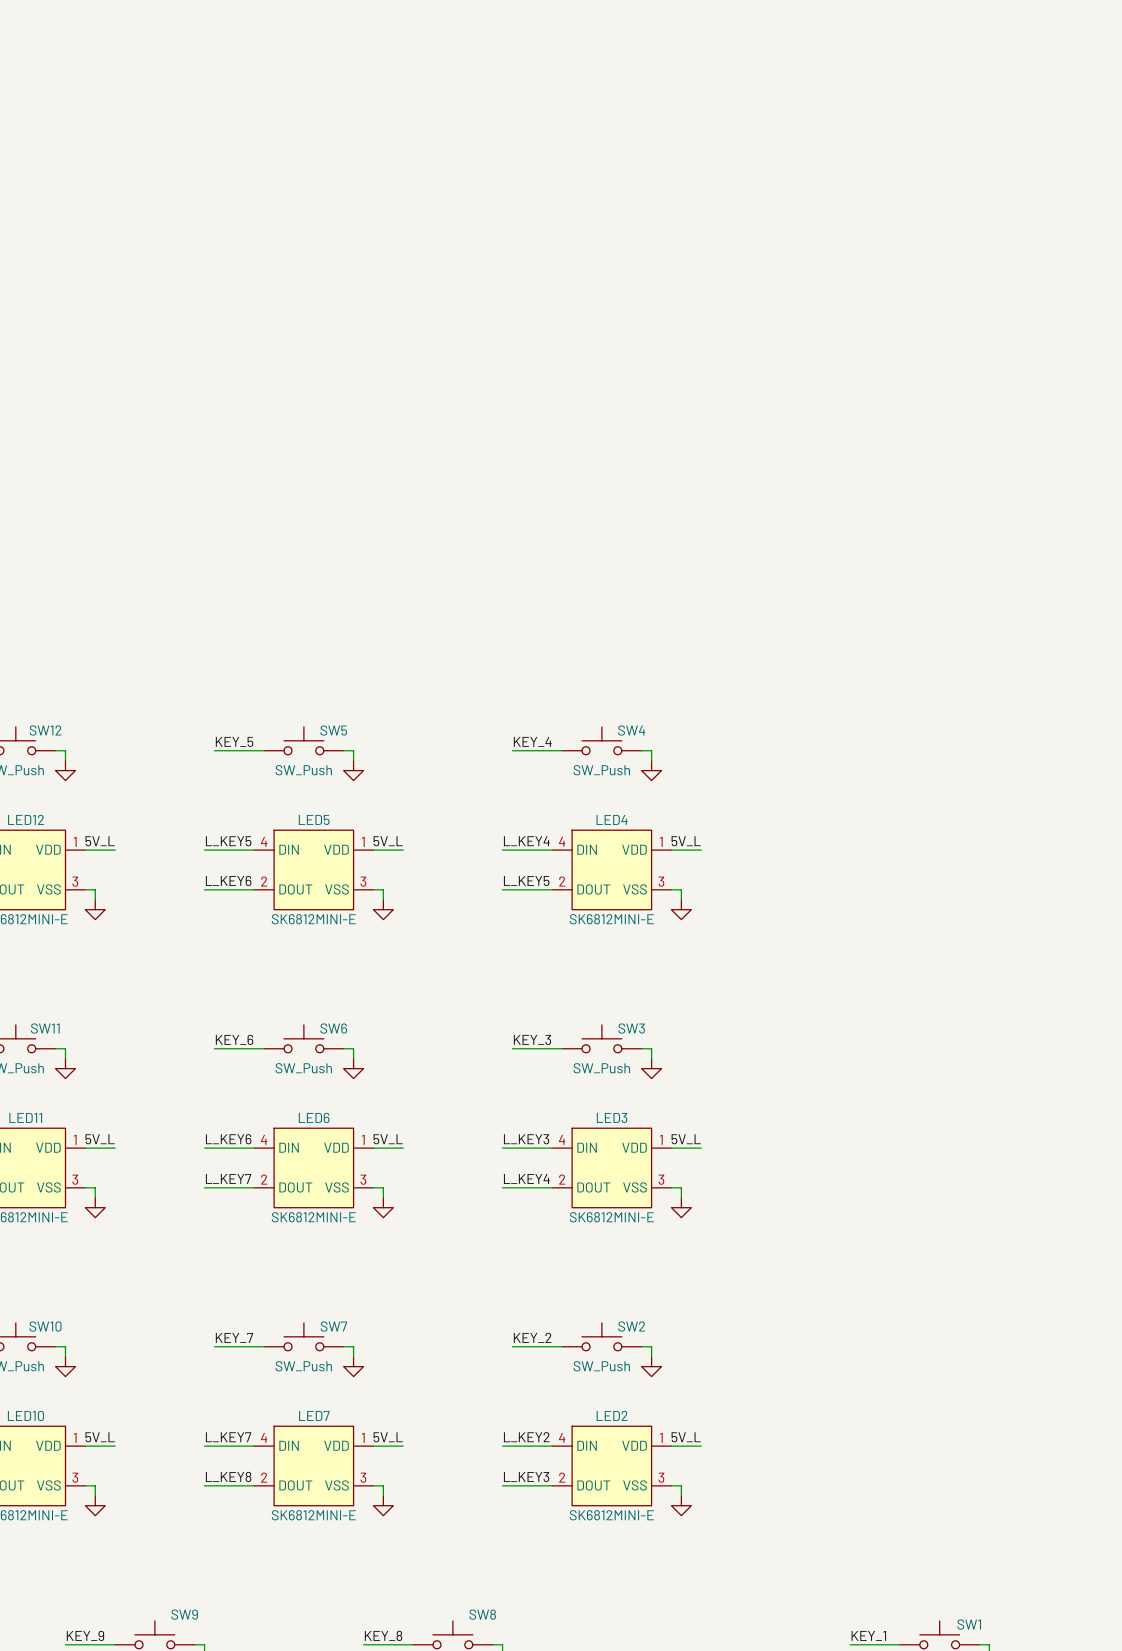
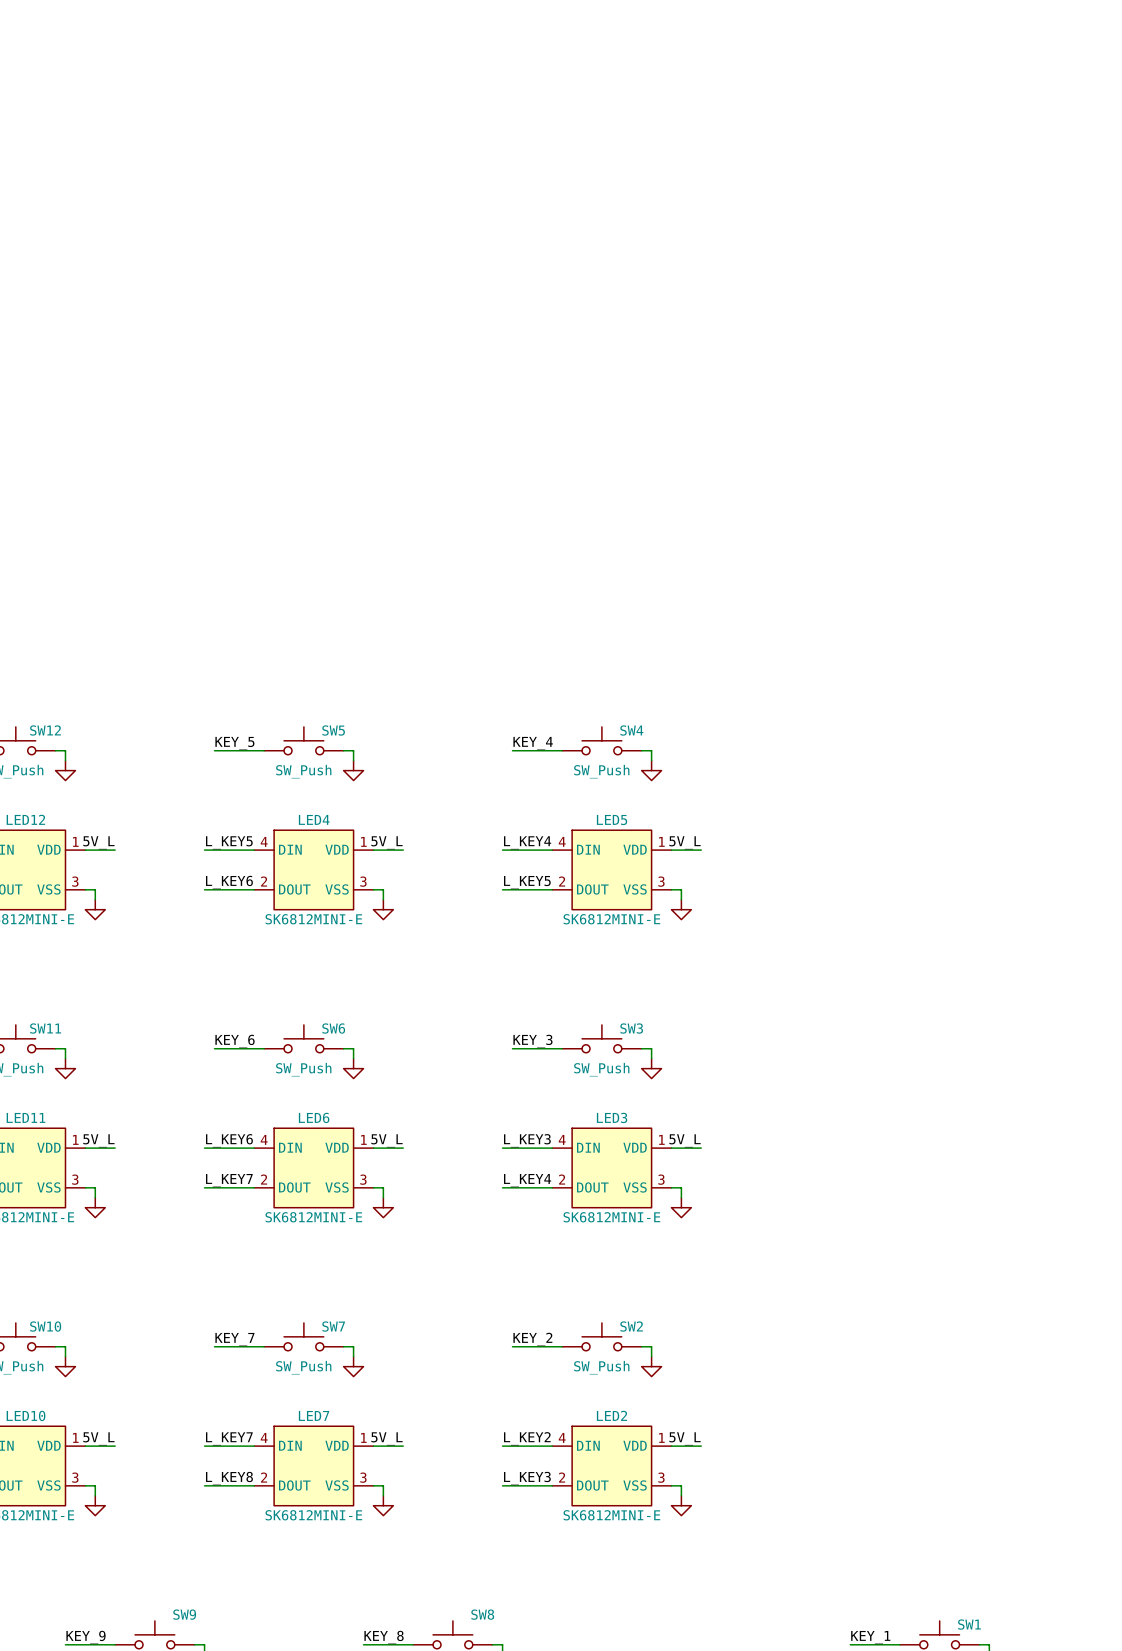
LED5 name: LED5 (314, 819) -> LED4 (314, 819)
LED4 name: LED4 (612, 819) -> LED5 (612, 820)

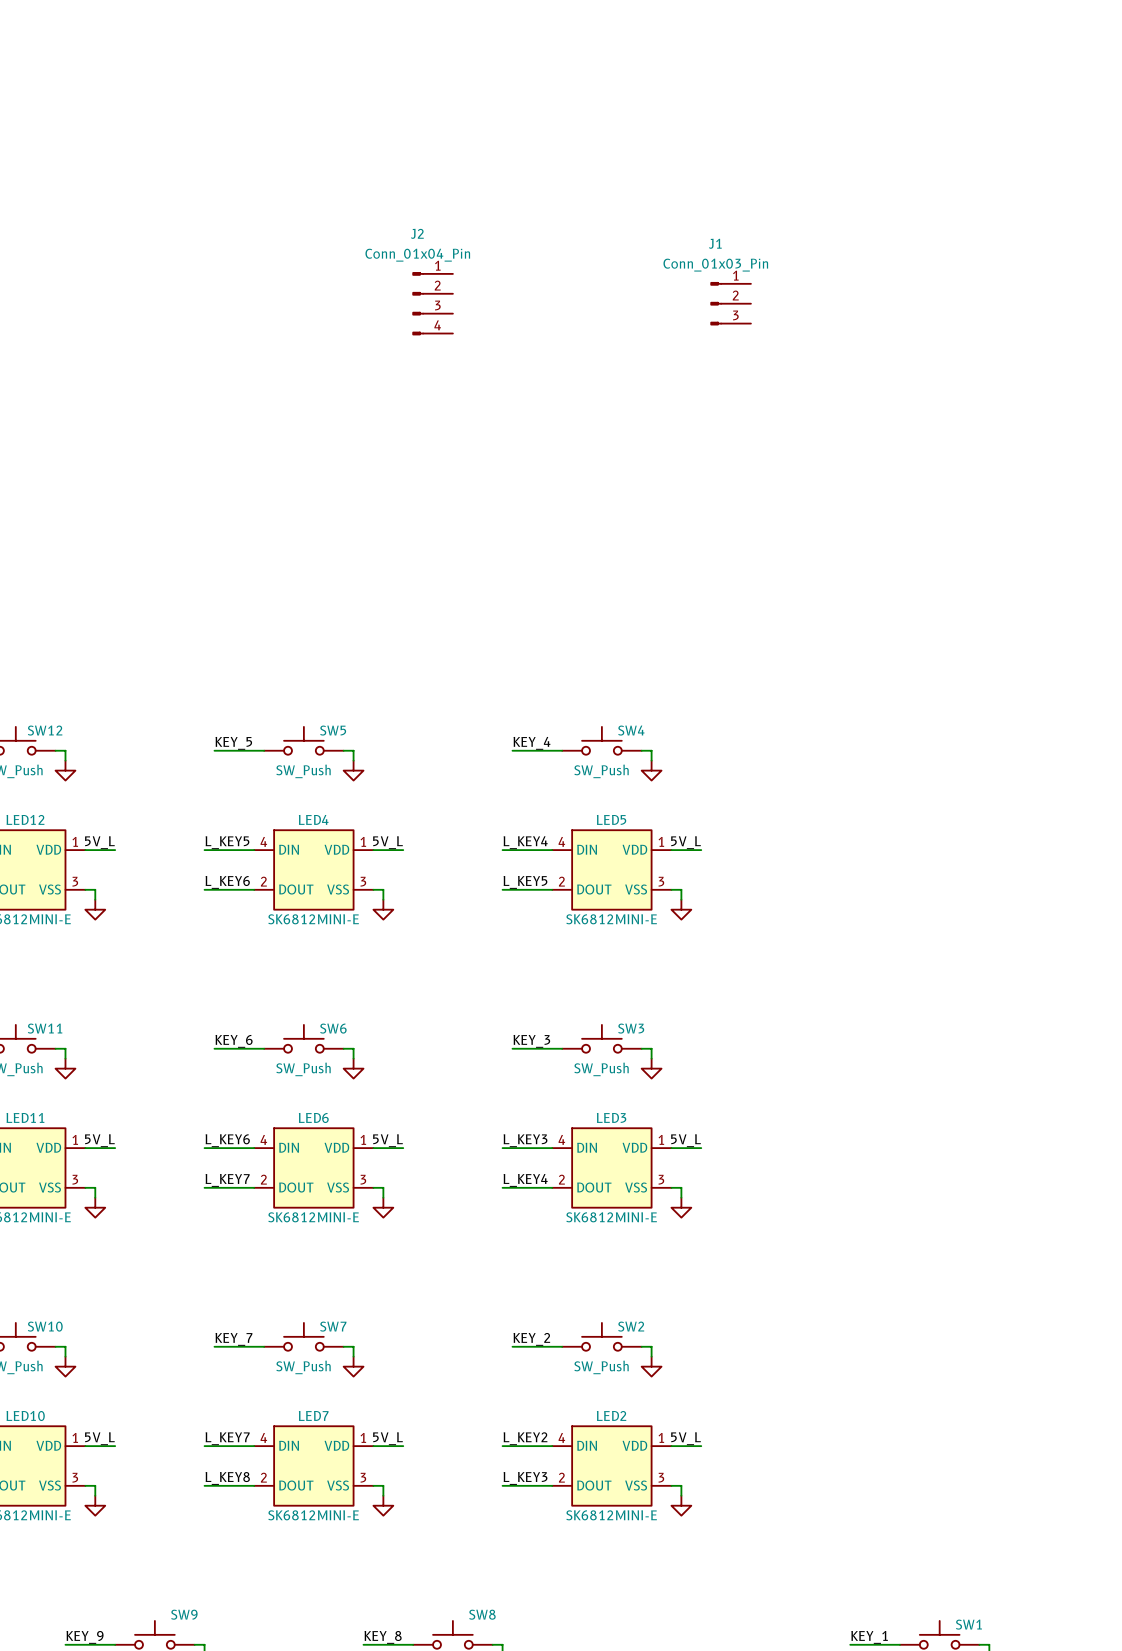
J2: none -> Conn_01x04_Pin (432, 303)
J1: none -> Conn_01x03_Pin (730, 303)

